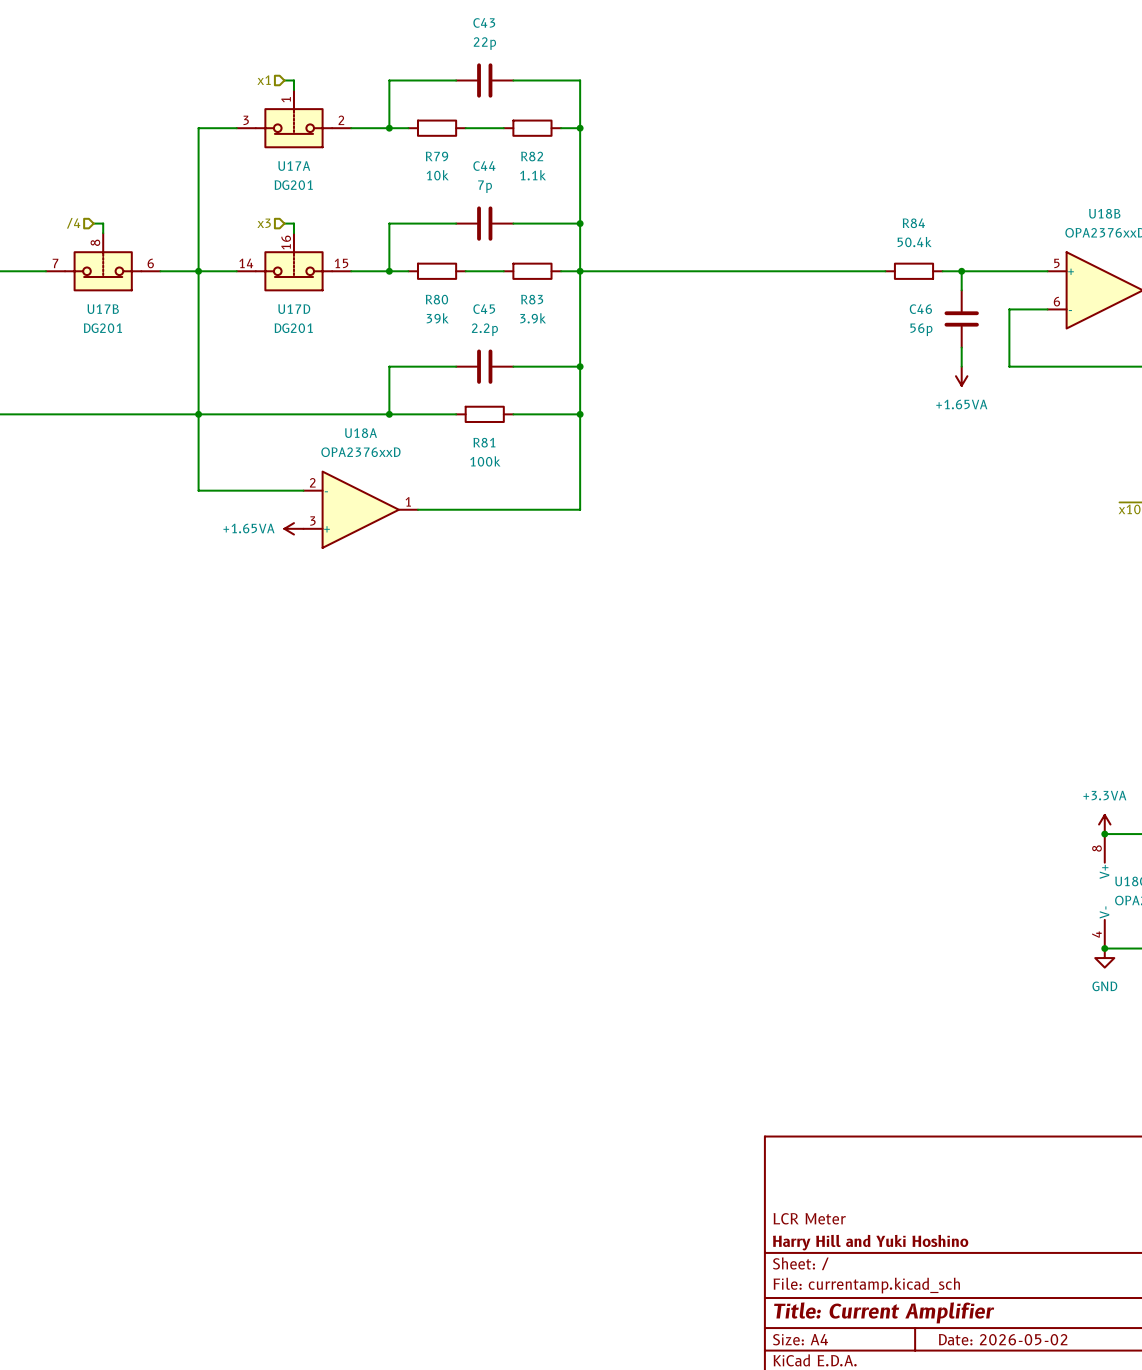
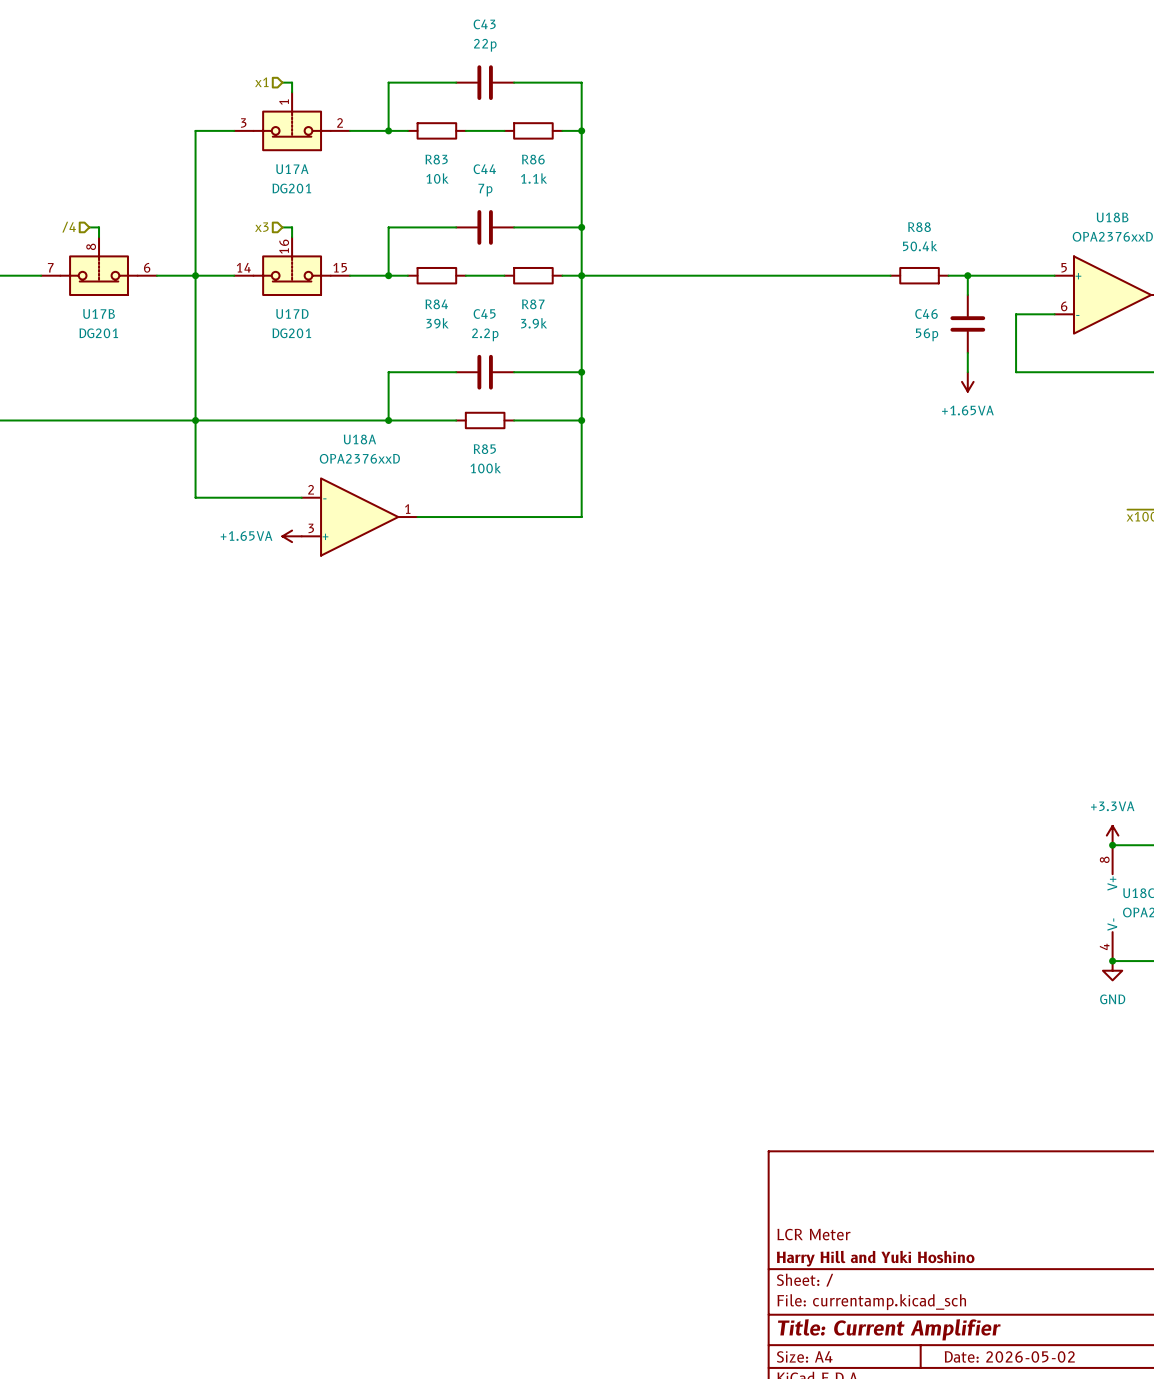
R79 name: R79 (436, 156) -> R83 (436, 159)
R82 name: R82 (532, 156) -> R86 (533, 159)
R84 name: R84 (913, 223) -> R88 (919, 227)
R80 name: R80 (436, 299) -> R84 (436, 304)
R83 name: R83 (532, 299) -> R87 (533, 304)
R81 name: R81 (484, 442) -> R85 (484, 449)

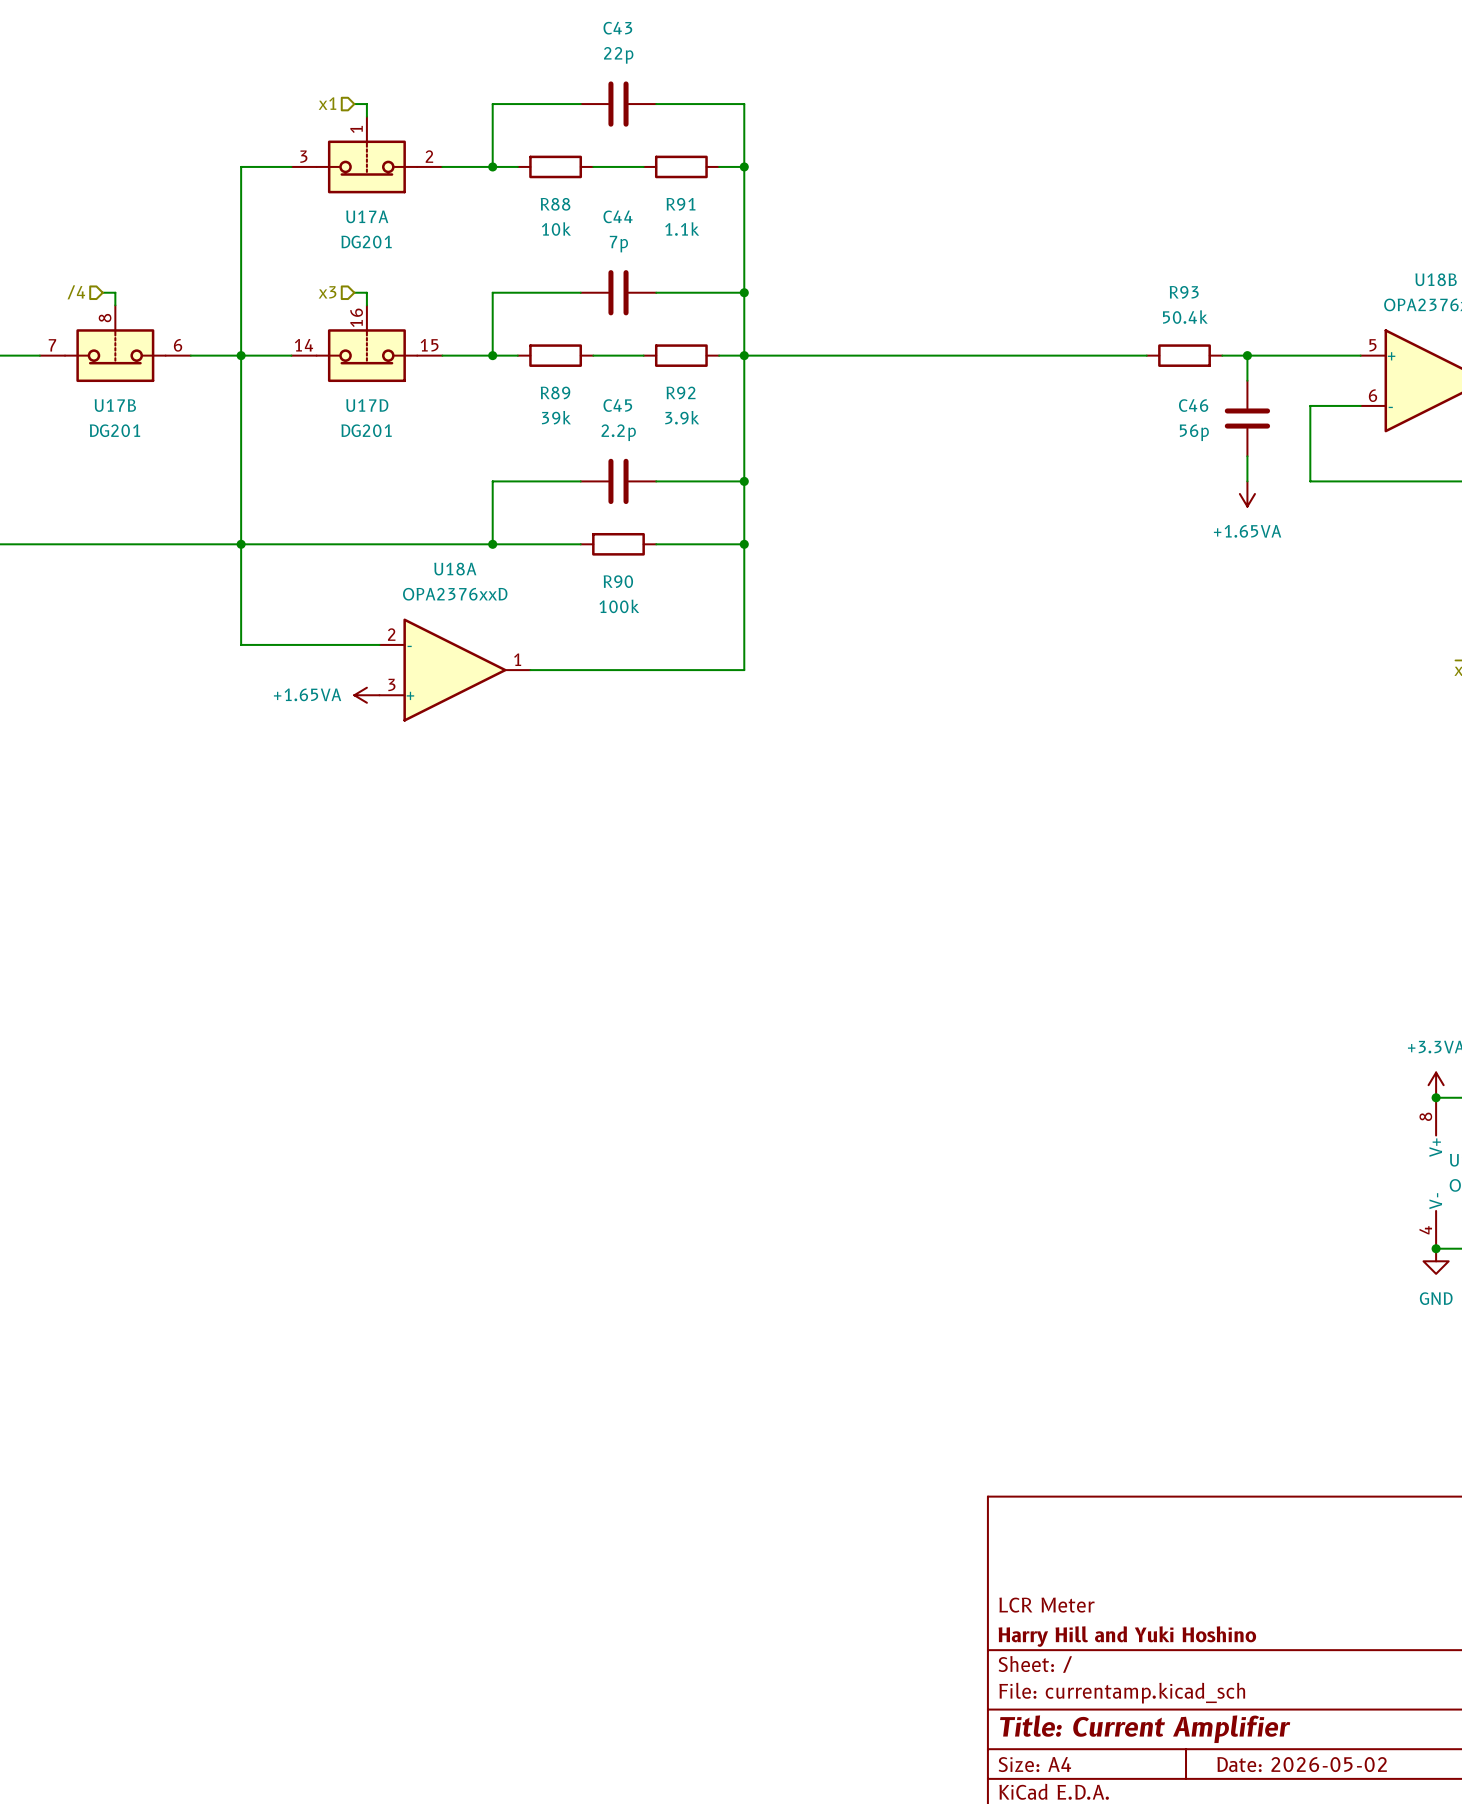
R83 name: R83 (436, 159) -> R88 (555, 204)
R86 name: R86 (533, 159) -> R91 (680, 204)
R88 name: R88 (919, 227) -> R93 (1184, 292)
R84 name: R84 (436, 304) -> R89 (555, 392)
R87 name: R87 (533, 304) -> R92 (681, 392)
R85 name: R85 (484, 449) -> R90 (618, 581)

